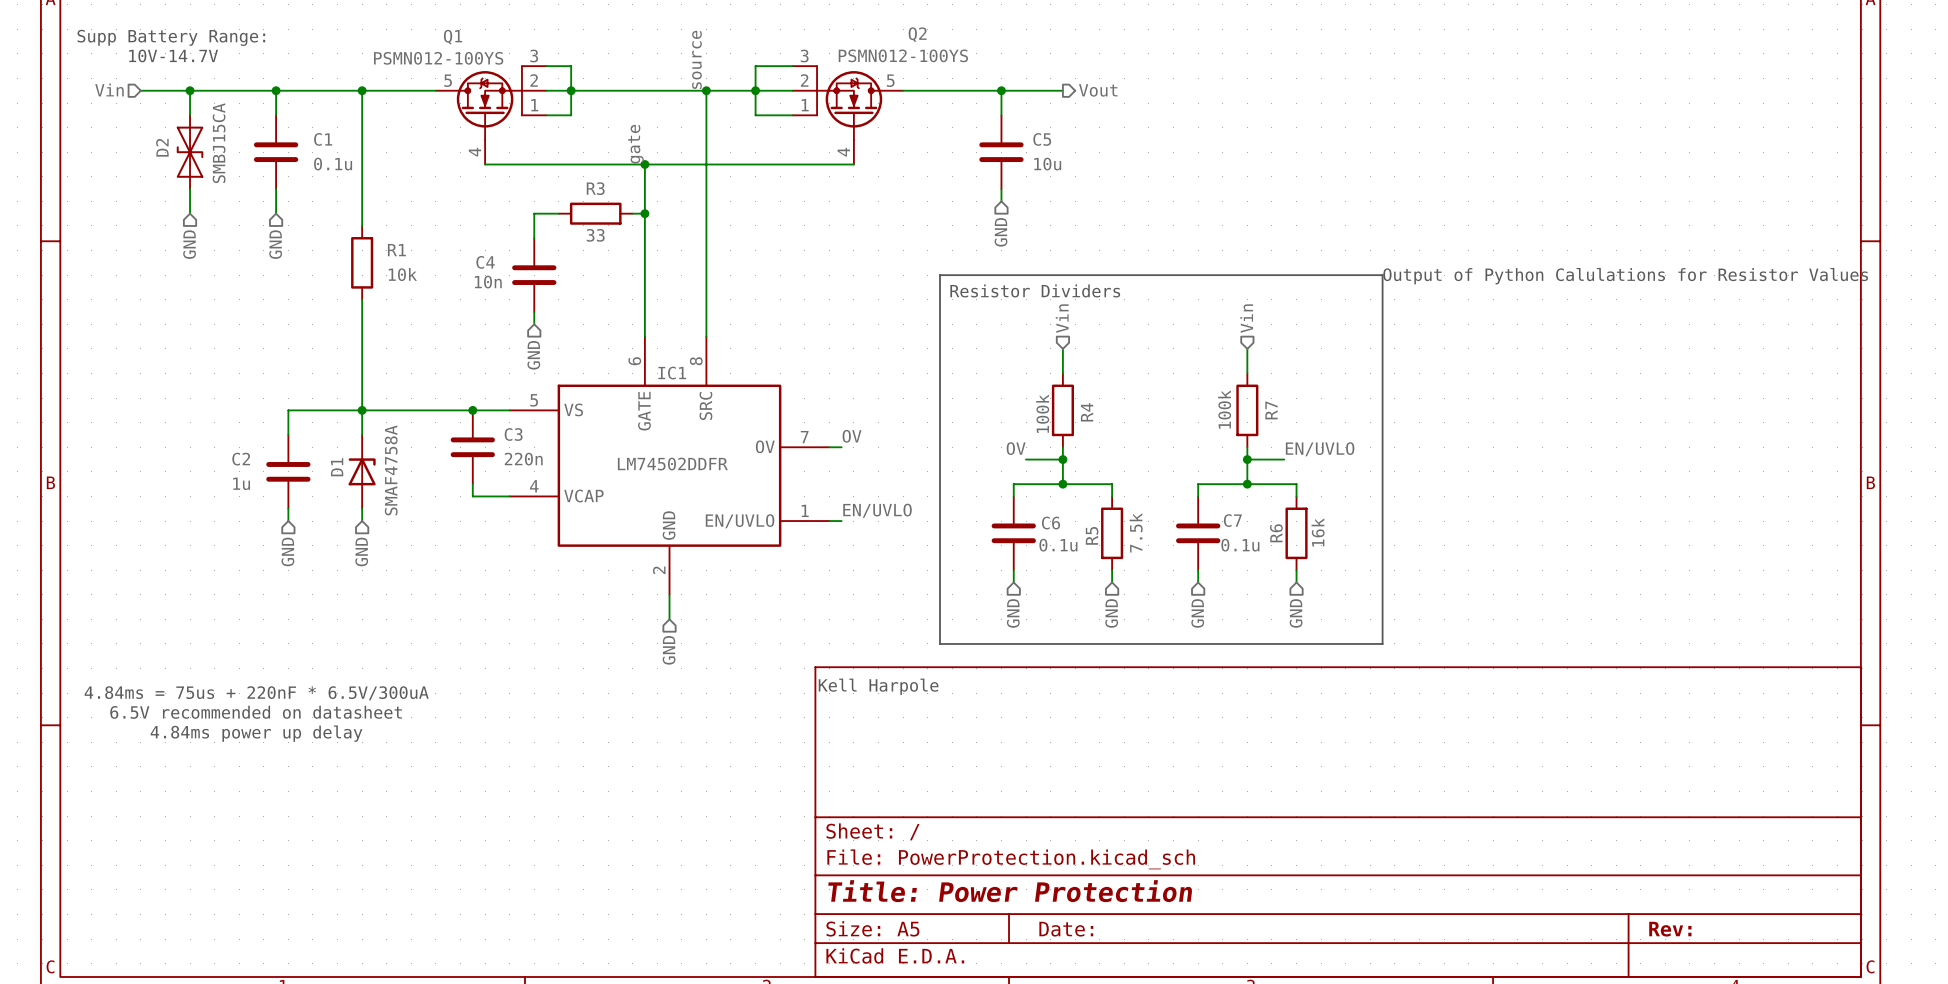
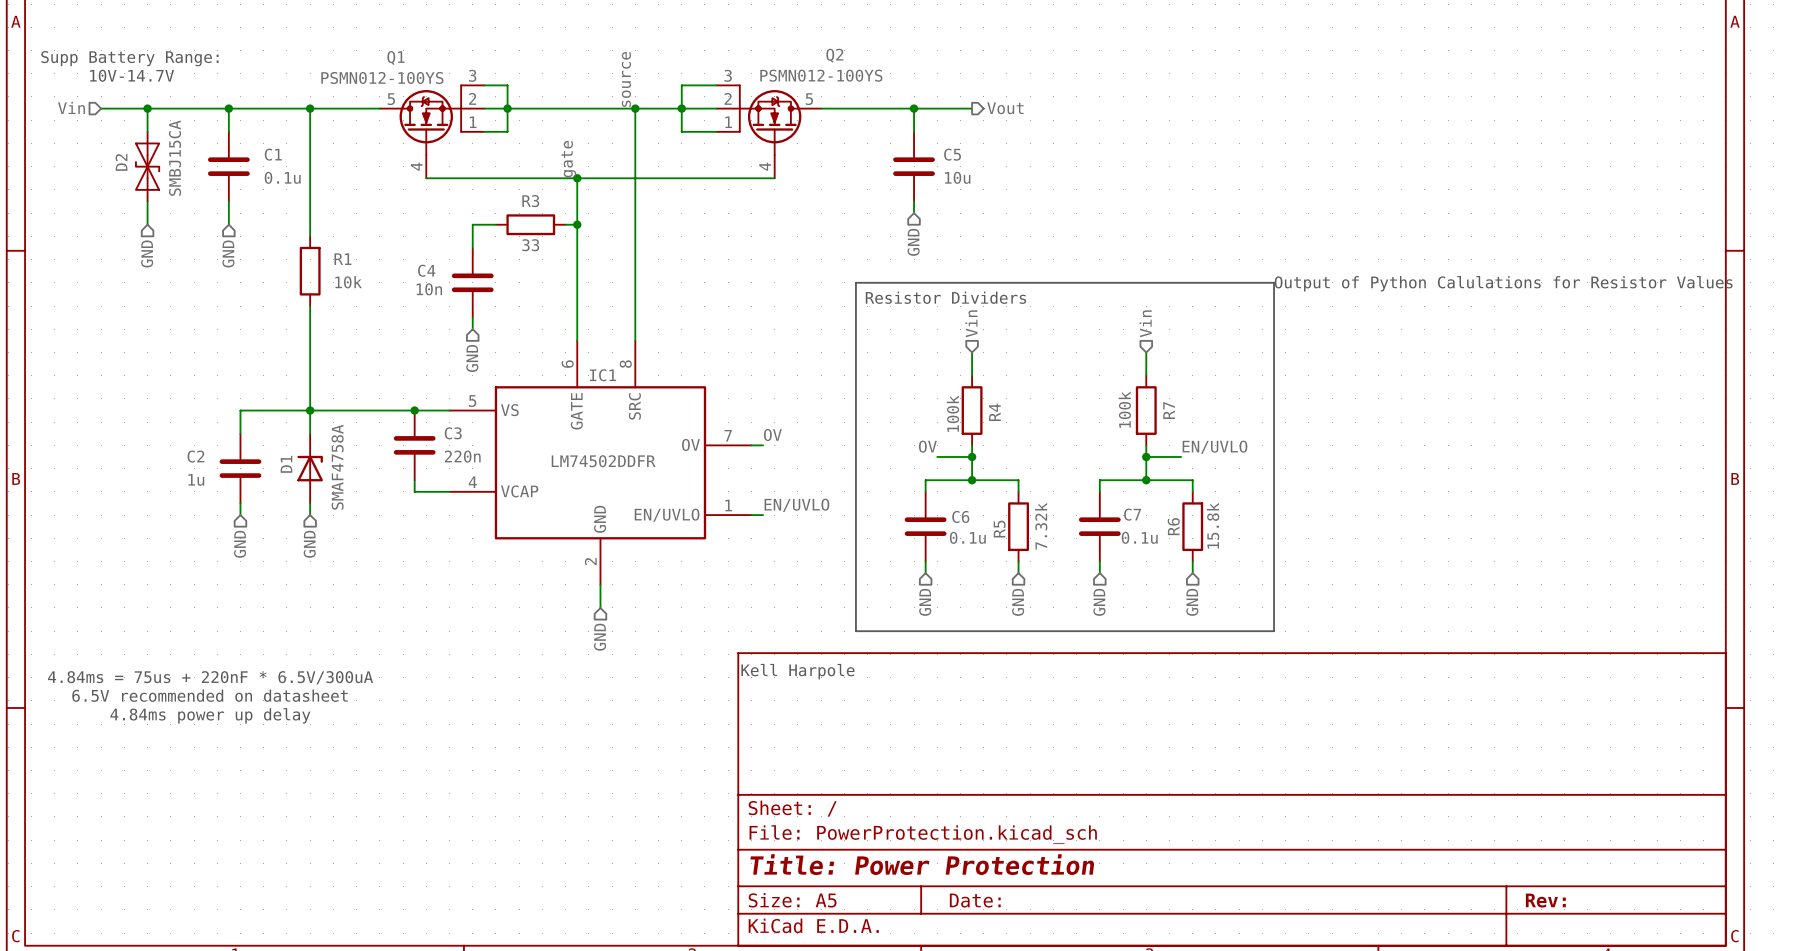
R5 value: 7.5k (1136, 532) -> 7.32k (1041, 526)
R6 value: 16k (1318, 532) -> 15.8k (1213, 525)

